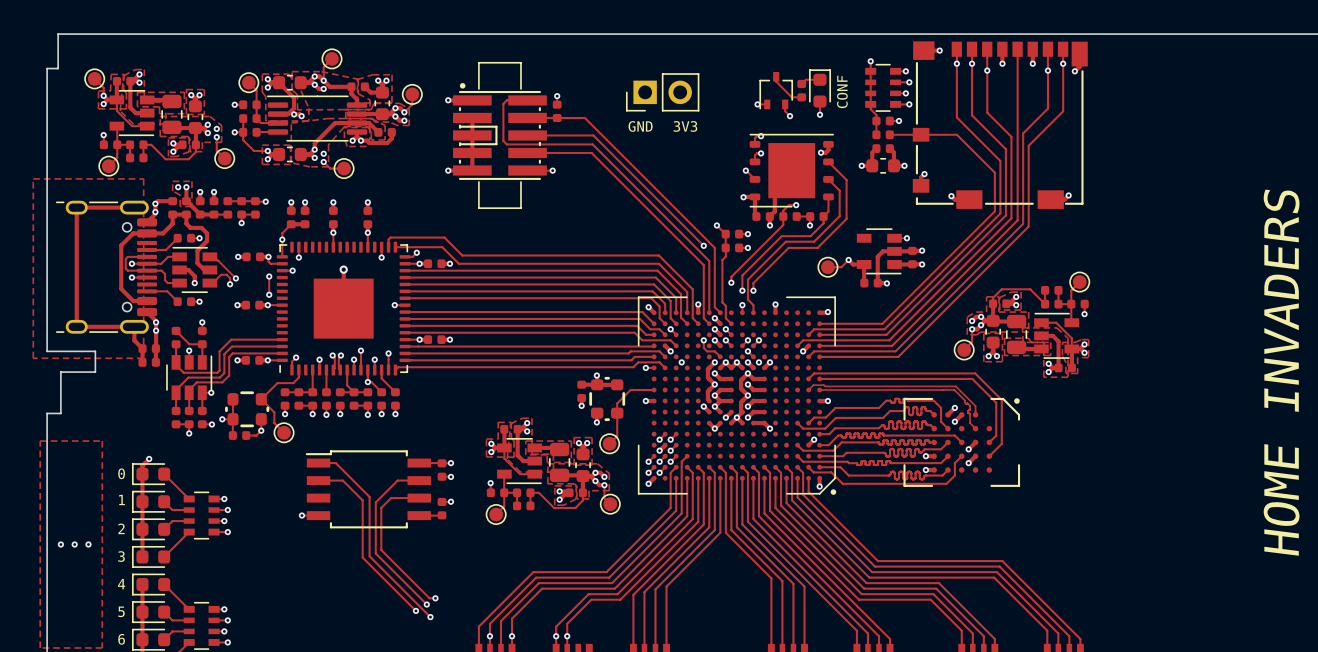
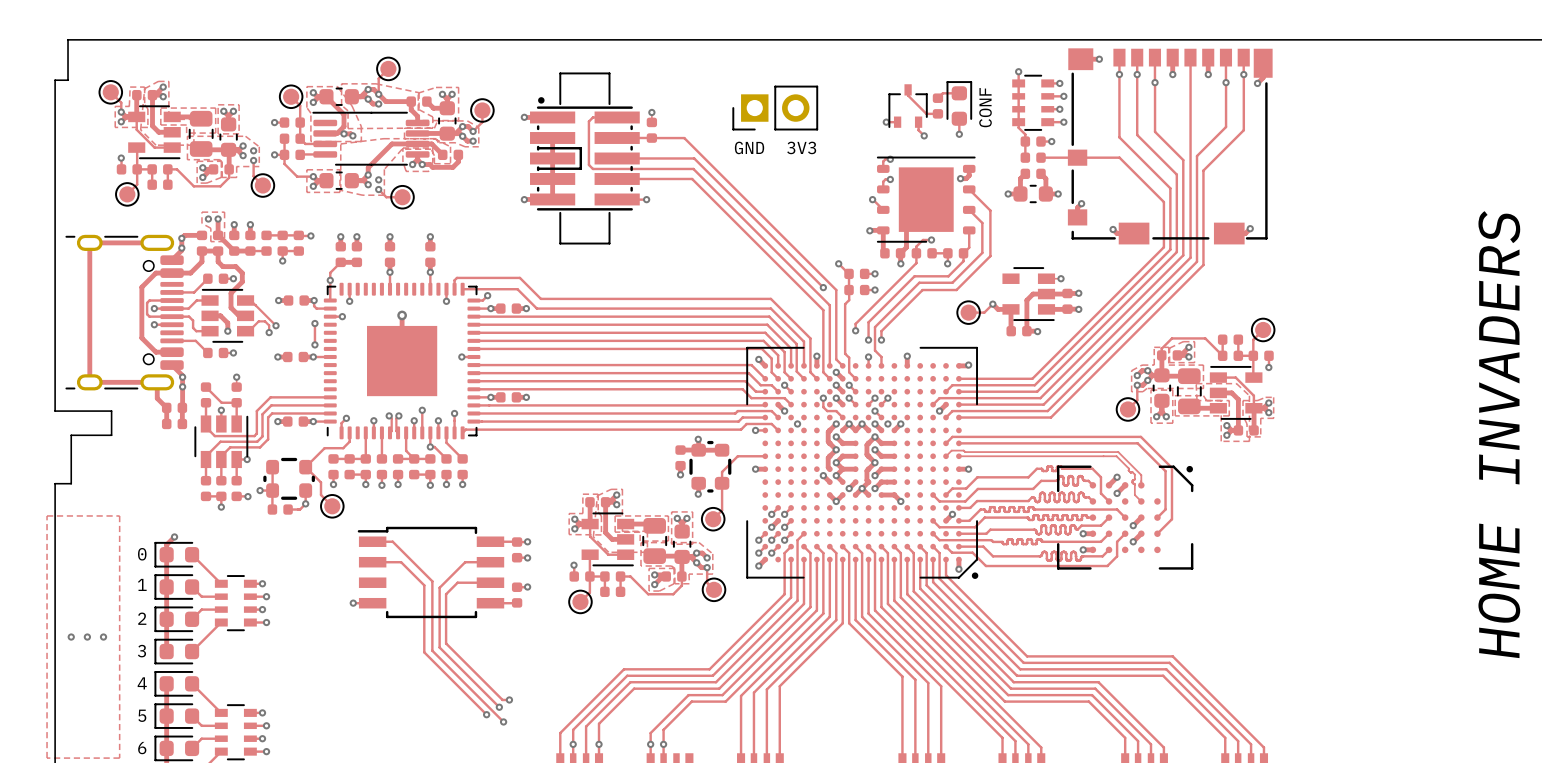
zone outline: (33, 178) (33, 358) (143, 358) (143, 178) (33, 178) -> none

